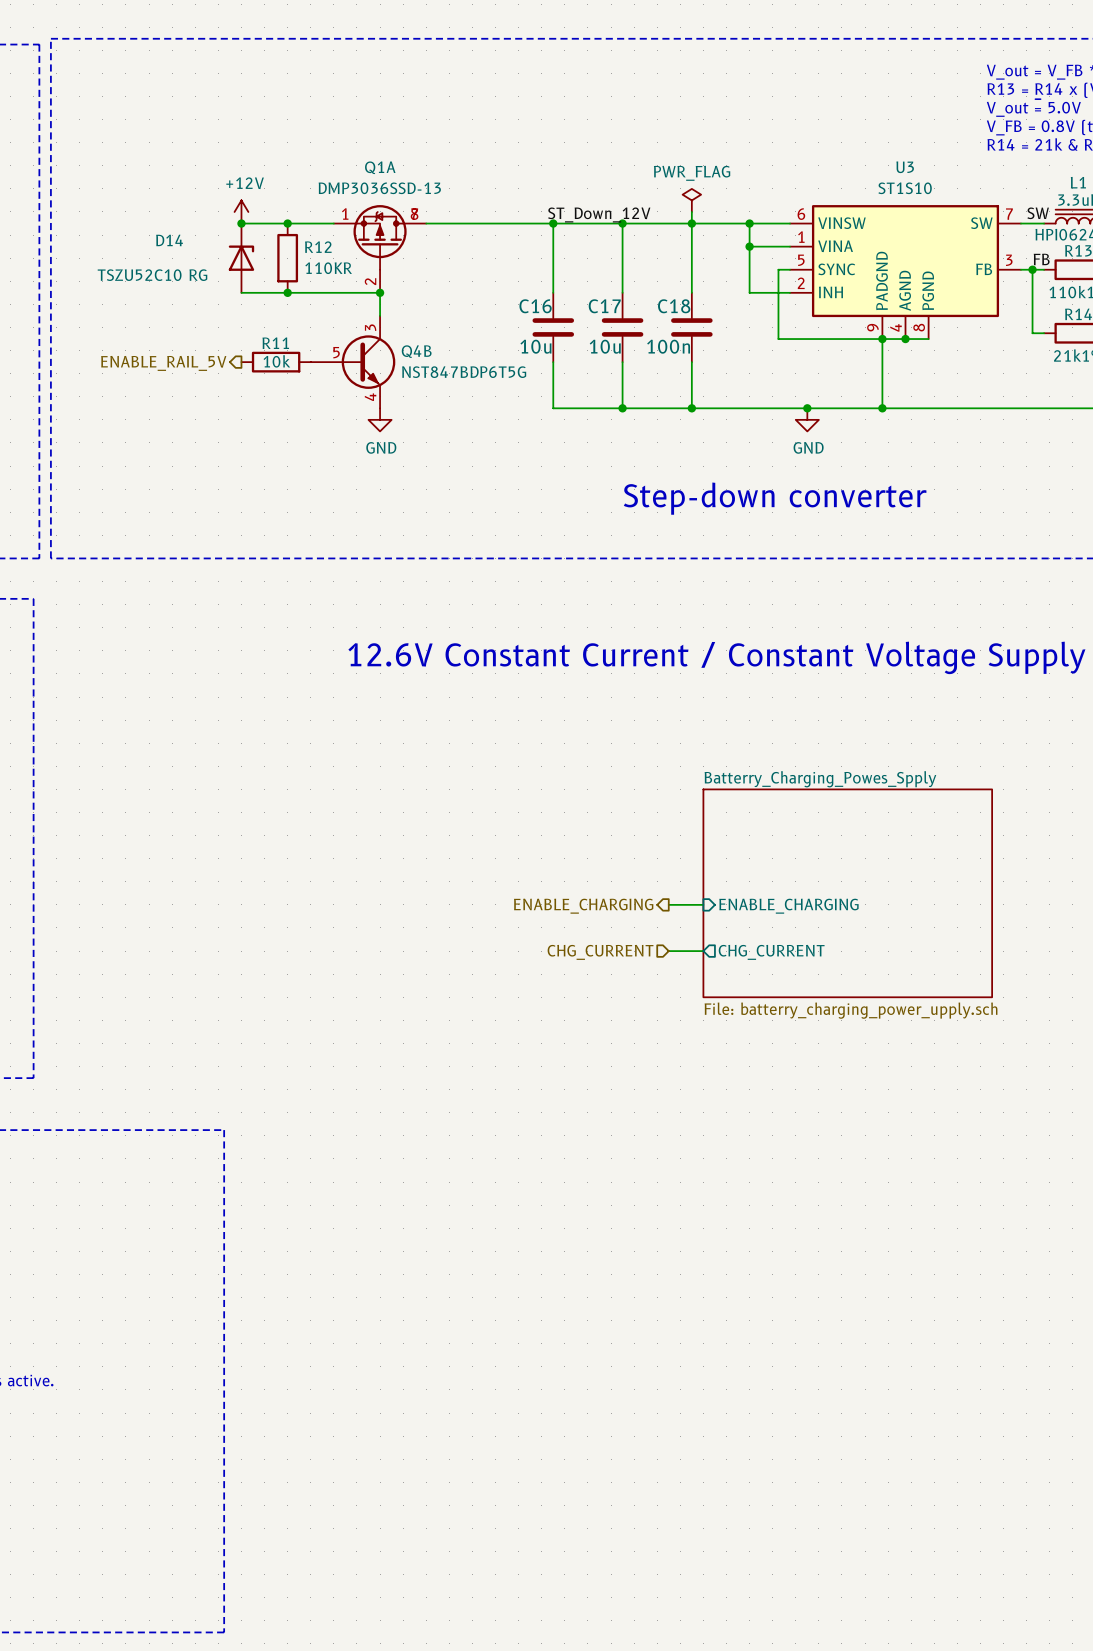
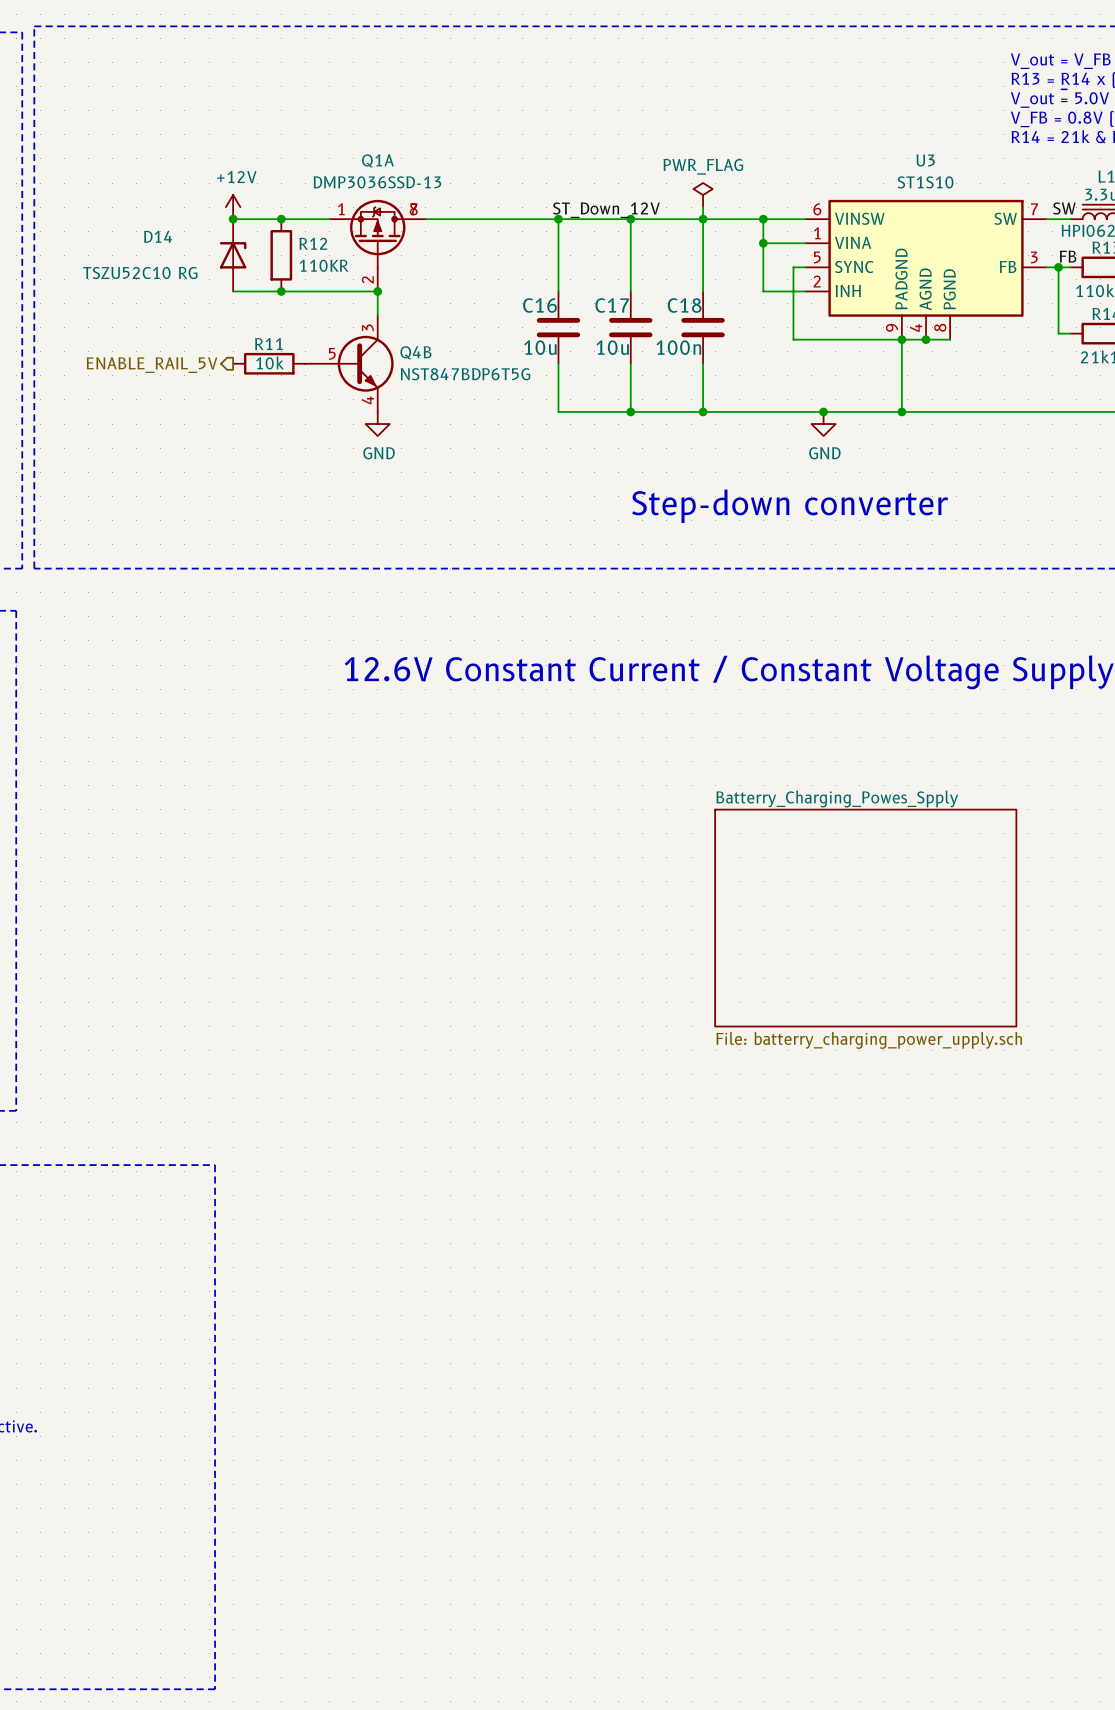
wire: (668, 904) (703, 904) -> none
hierarchical label: ENABLE_CHARGING (583, 906) -> none
sheet pin: ENABLE_CHARGING (788, 906) -> none
wire: (668, 951) (703, 951) -> none
hierarchical label: CHG_CURRENT (600, 952) -> none
sheet pin: CHG_CURRENT (771, 952) -> none

